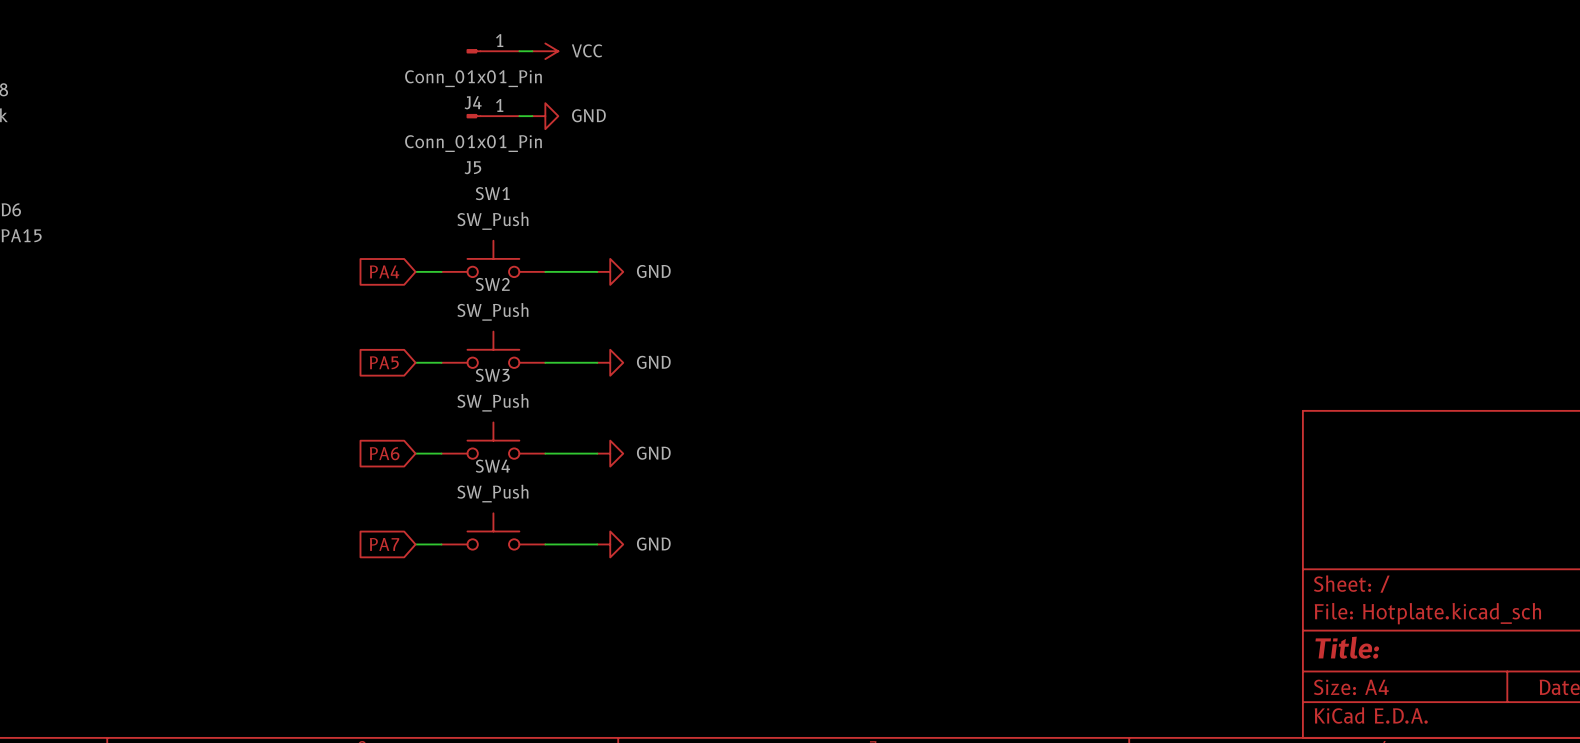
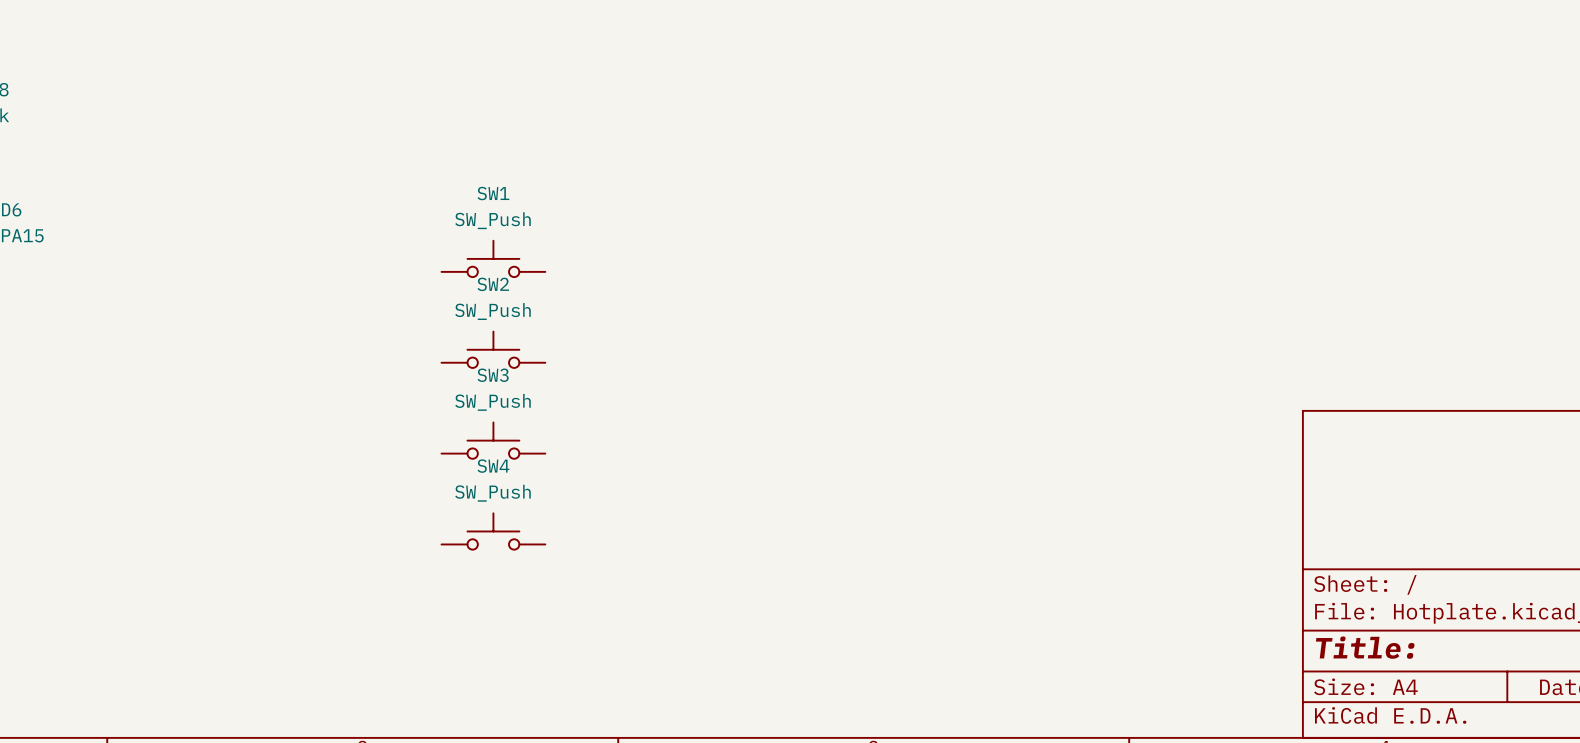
J4: Conn_01x01_Pin (493, 51) -> none
wire: (519, 51) (532, 51) -> none
power symbol: VCC (545, 51) -> none
J5: Conn_01x01_Pin (493, 116) -> none
wire: (519, 116) (532, 116) -> none
power symbol: GND (545, 116) -> none
global label: PA4 (384, 271) -> none
wire: (415, 271) (441, 271) -> none
wire: (545, 271) (597, 271) -> none
power symbol: GND (610, 271) -> none
global label: PA5 (384, 362) -> none
wire: (415, 362) (441, 362) -> none
wire: (545, 362) (597, 362) -> none
power symbol: GND (610, 362) -> none
global label: PA6 (384, 453) -> none
wire: (415, 453) (441, 453) -> none
wire: (545, 453) (597, 453) -> none
power symbol: GND (610, 453) -> none
global label: PA7 (384, 544) -> none
wire: (415, 544) (441, 544) -> none
wire: (545, 544) (597, 544) -> none
power symbol: GND (610, 544) -> none

